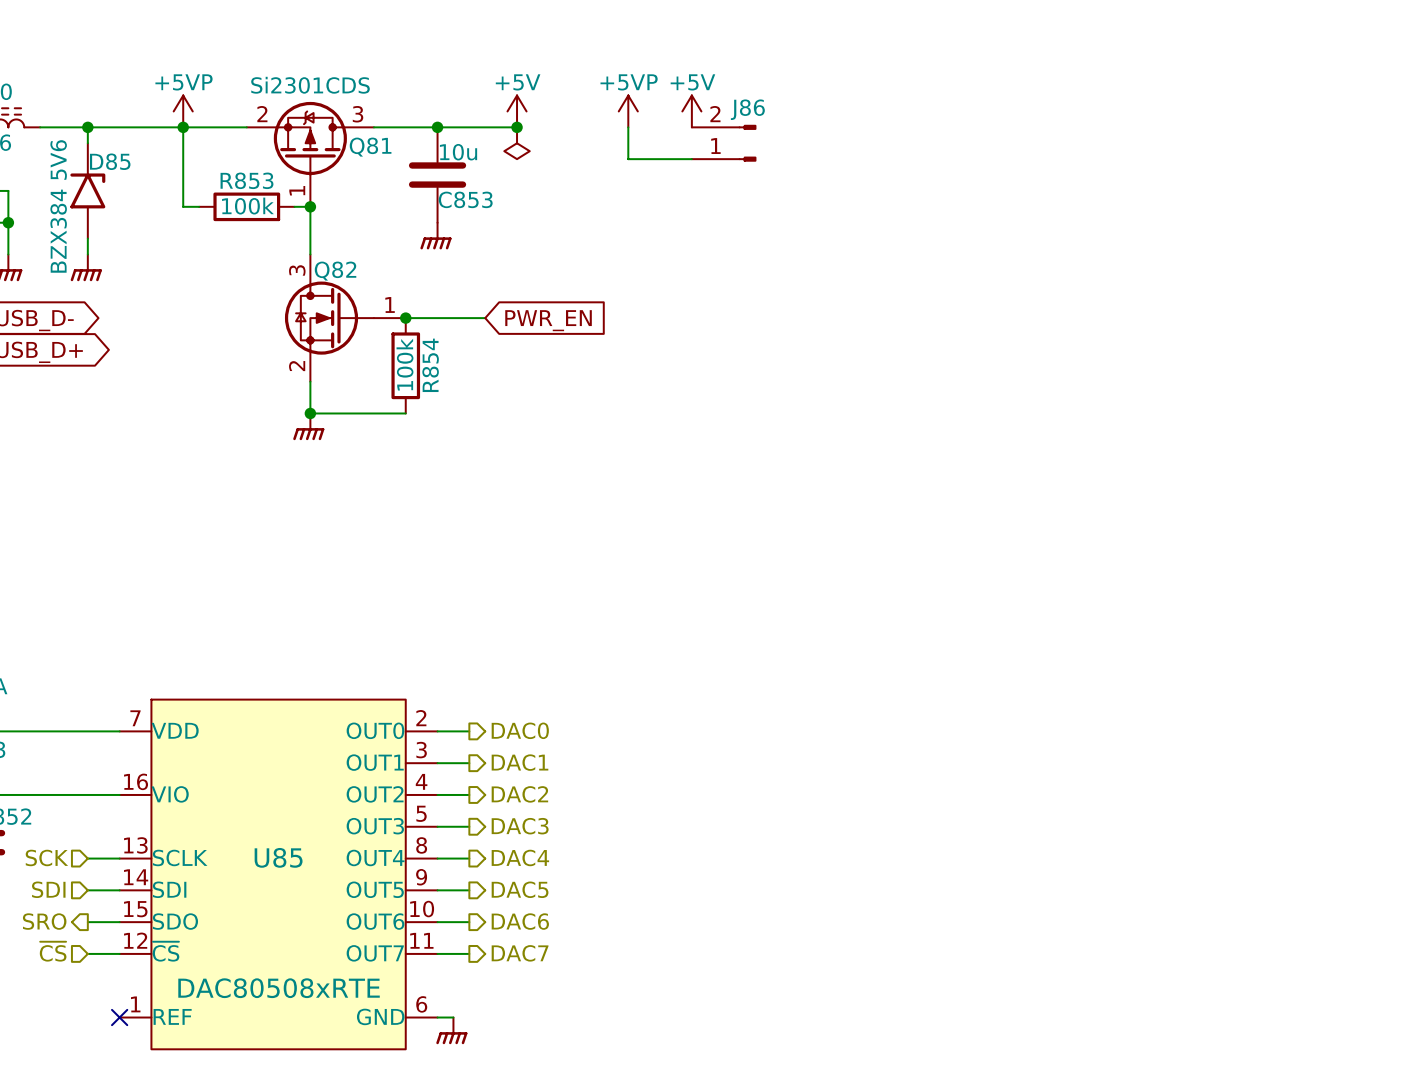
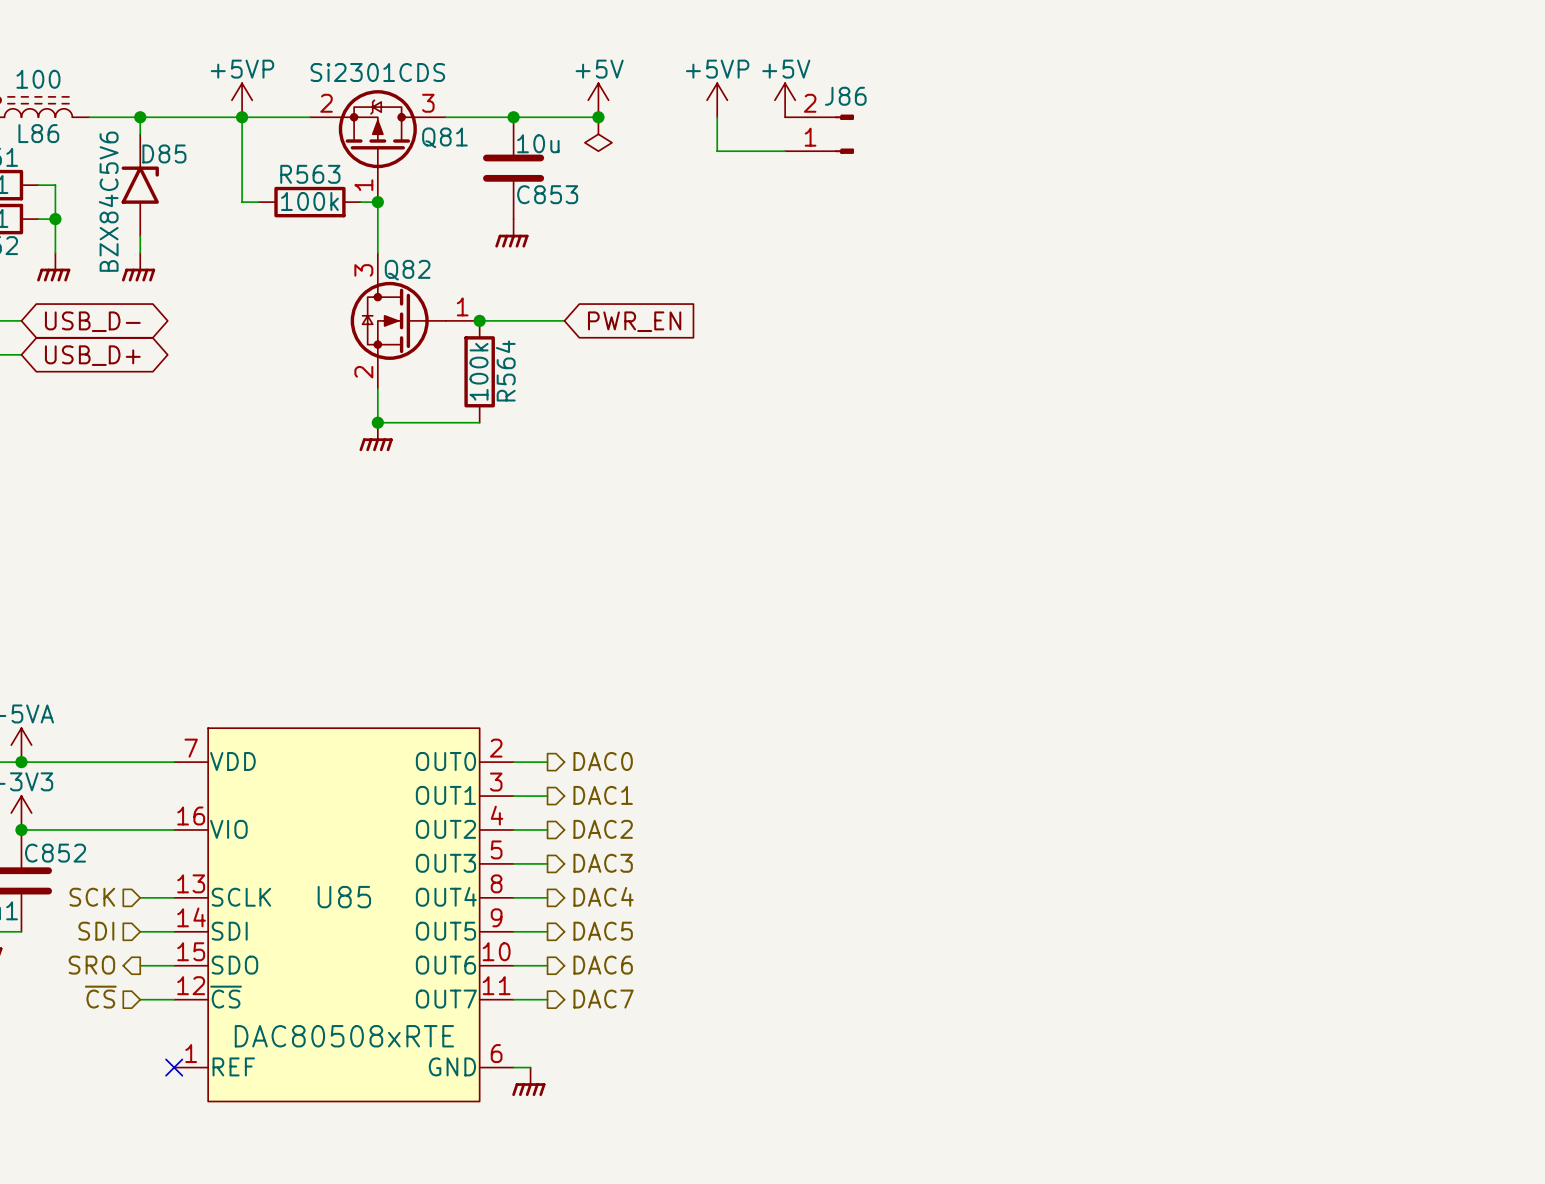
R853 name: R853 (246, 180) -> R563 (310, 174)
D85 value: BZX384 5V6 (58, 206) -> BZX84C5V6 (108, 201)
R854 name: R854 (430, 365) -> R564 (505, 371)

